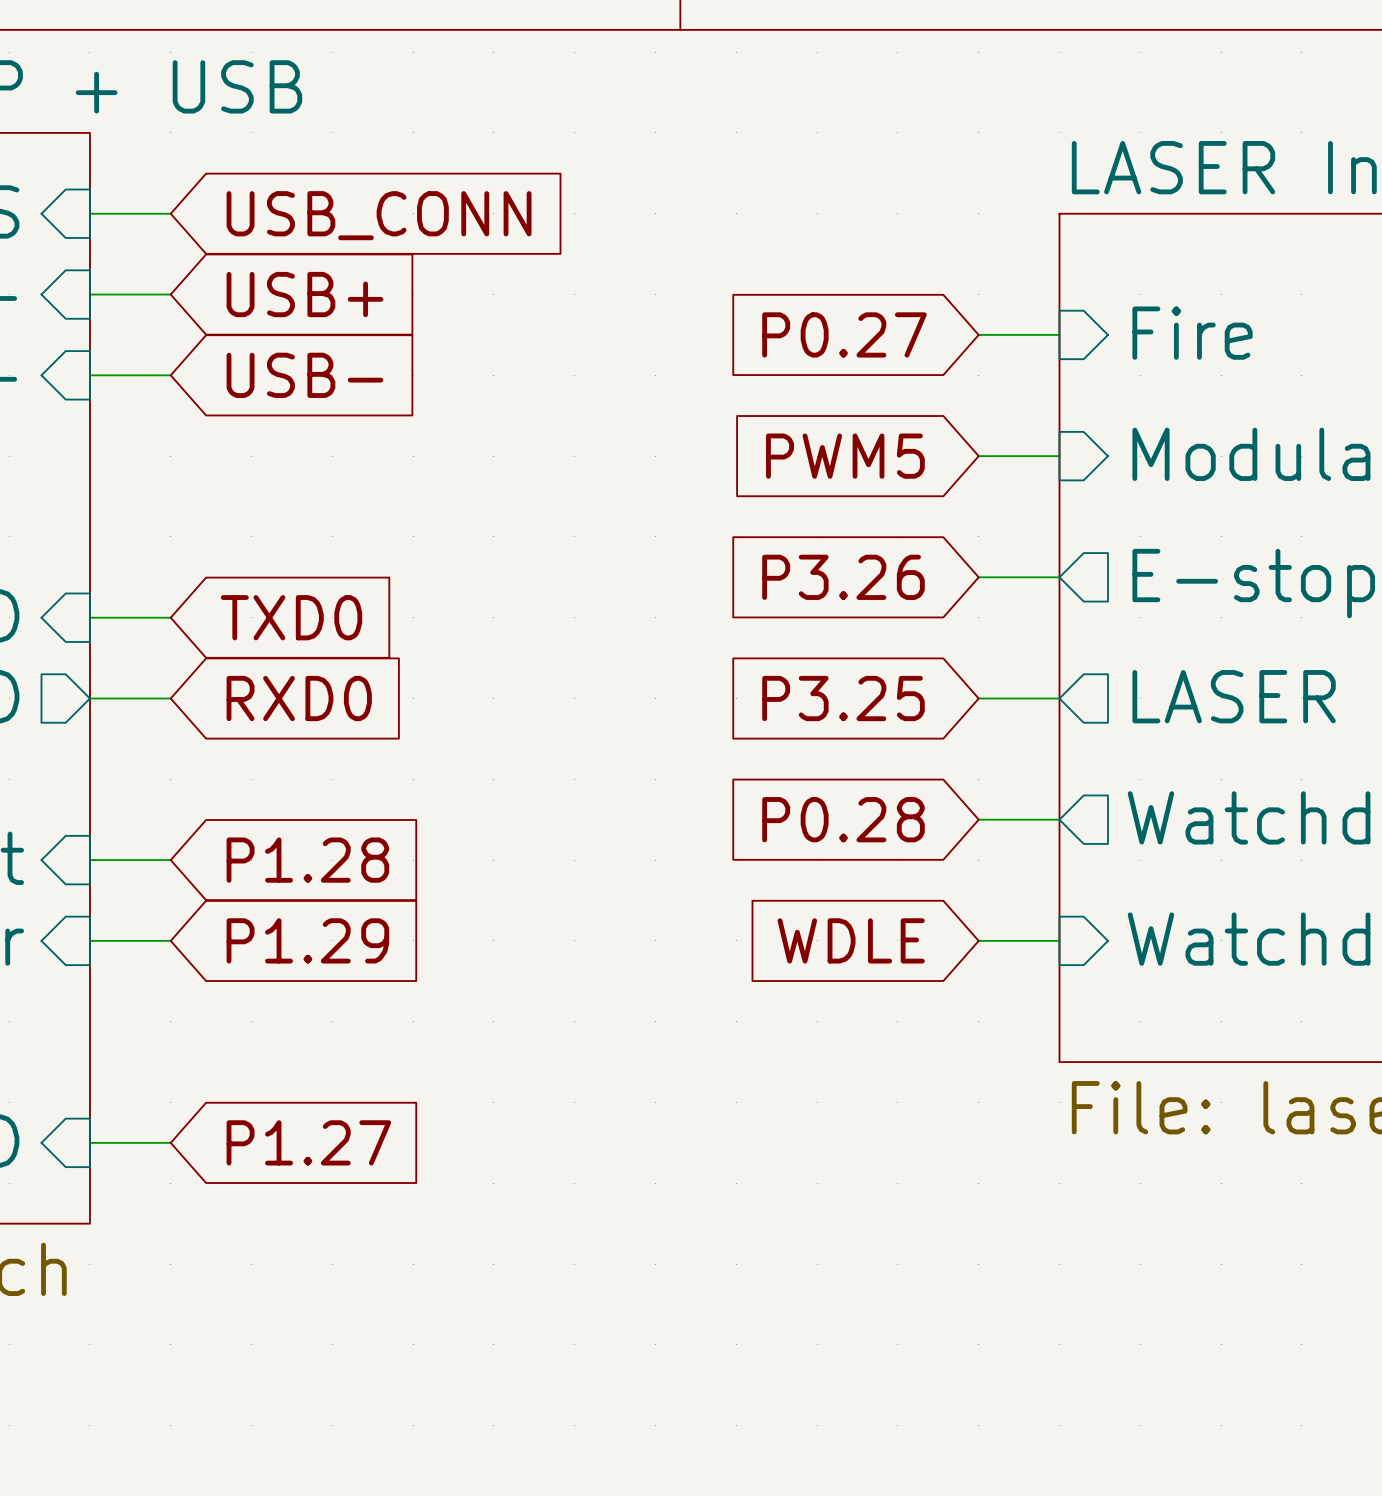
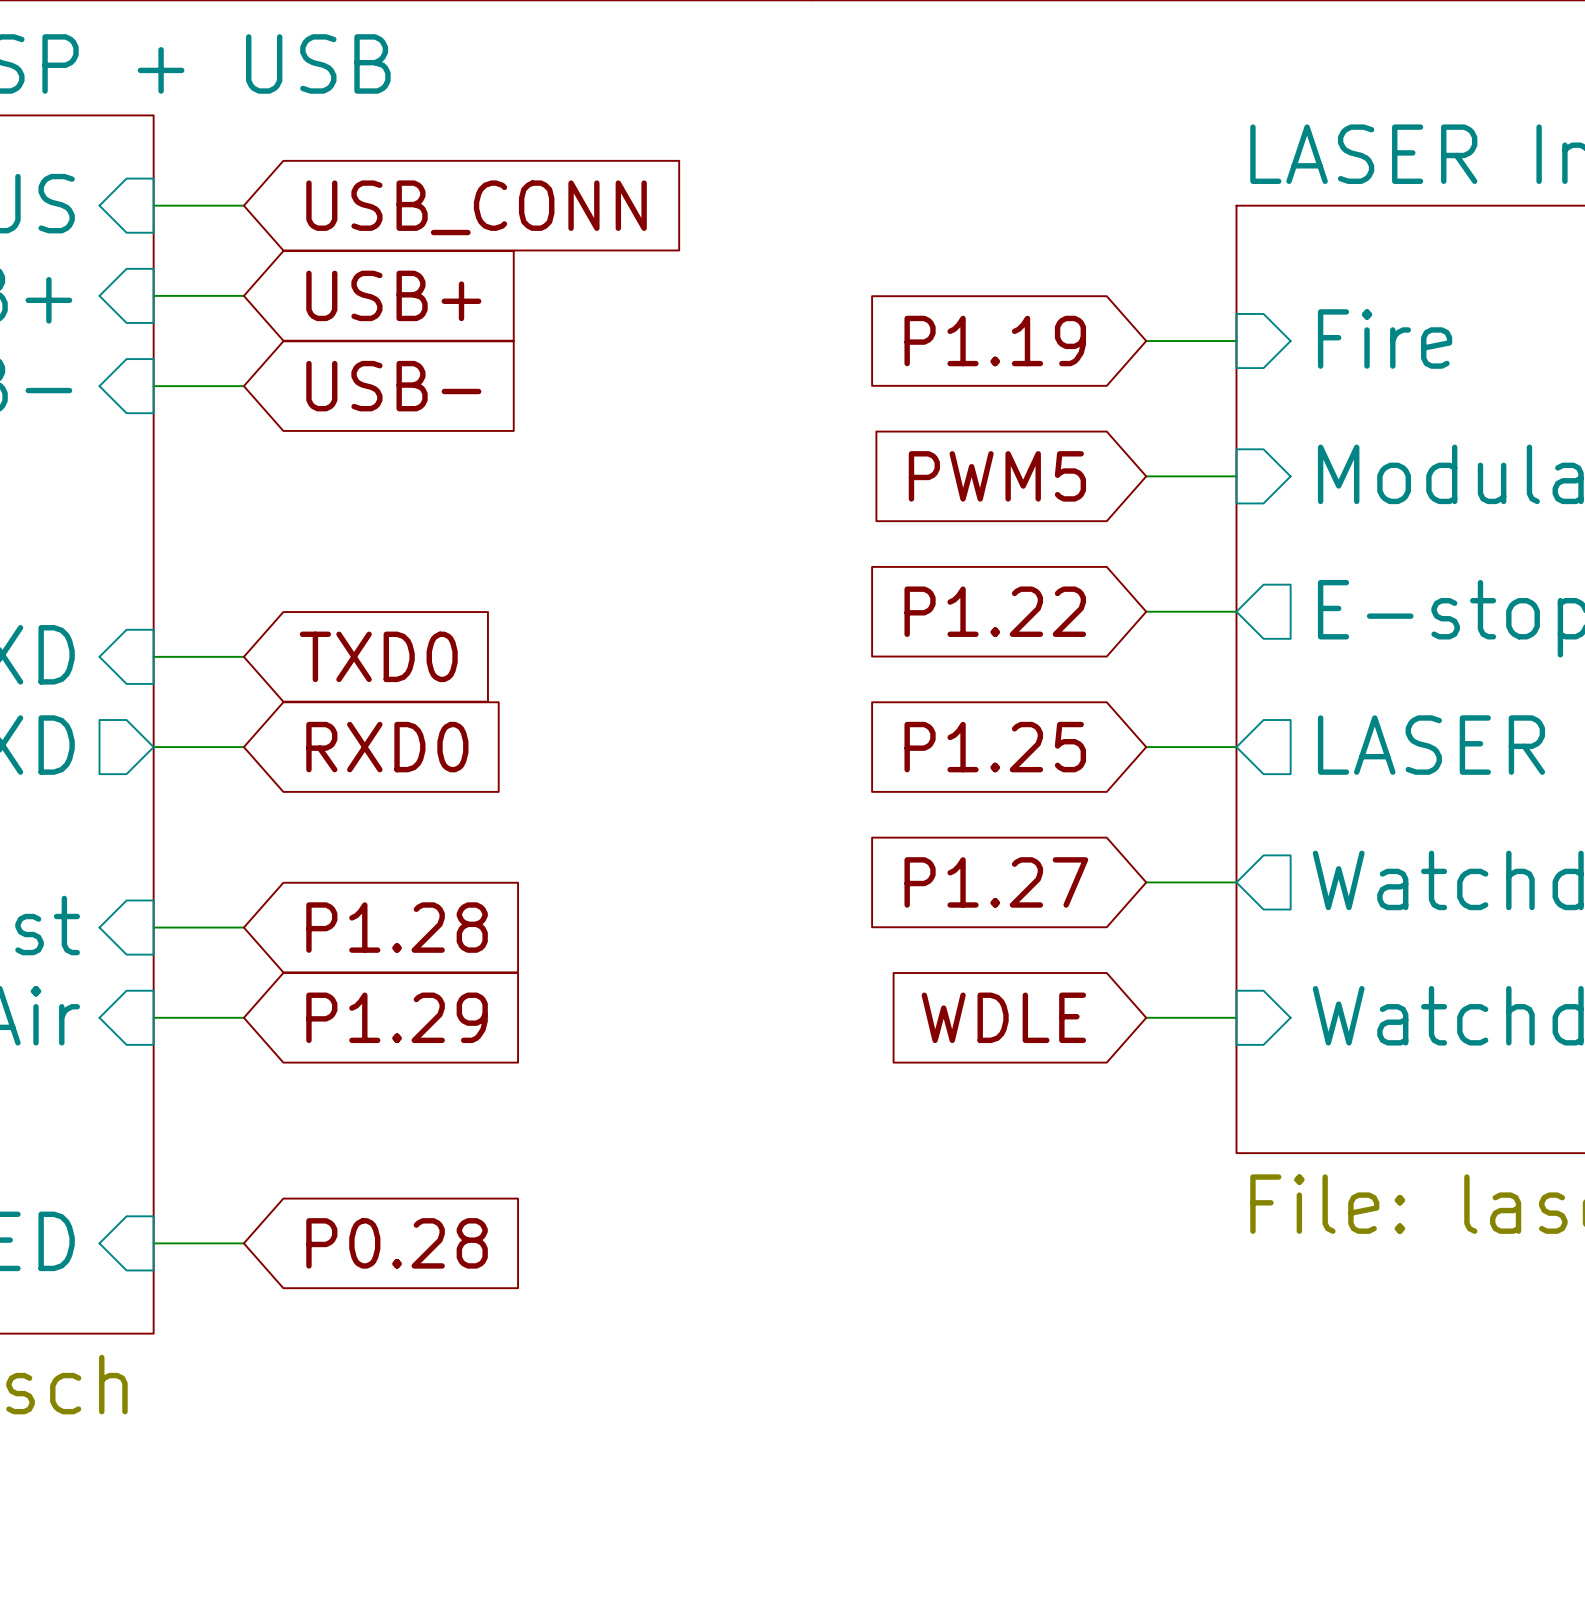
global label: P0.27 (844, 334) -> P1.19 (995, 341)
global label: P3.26 (843, 577) -> P1.22 (995, 611)
global label: P3.25 (843, 698) -> P1.25 (995, 747)
global label: P0.28 (843, 819) -> P1.27 (996, 882)
global label: P1.27 (308, 1142) -> P0.28 (397, 1243)

